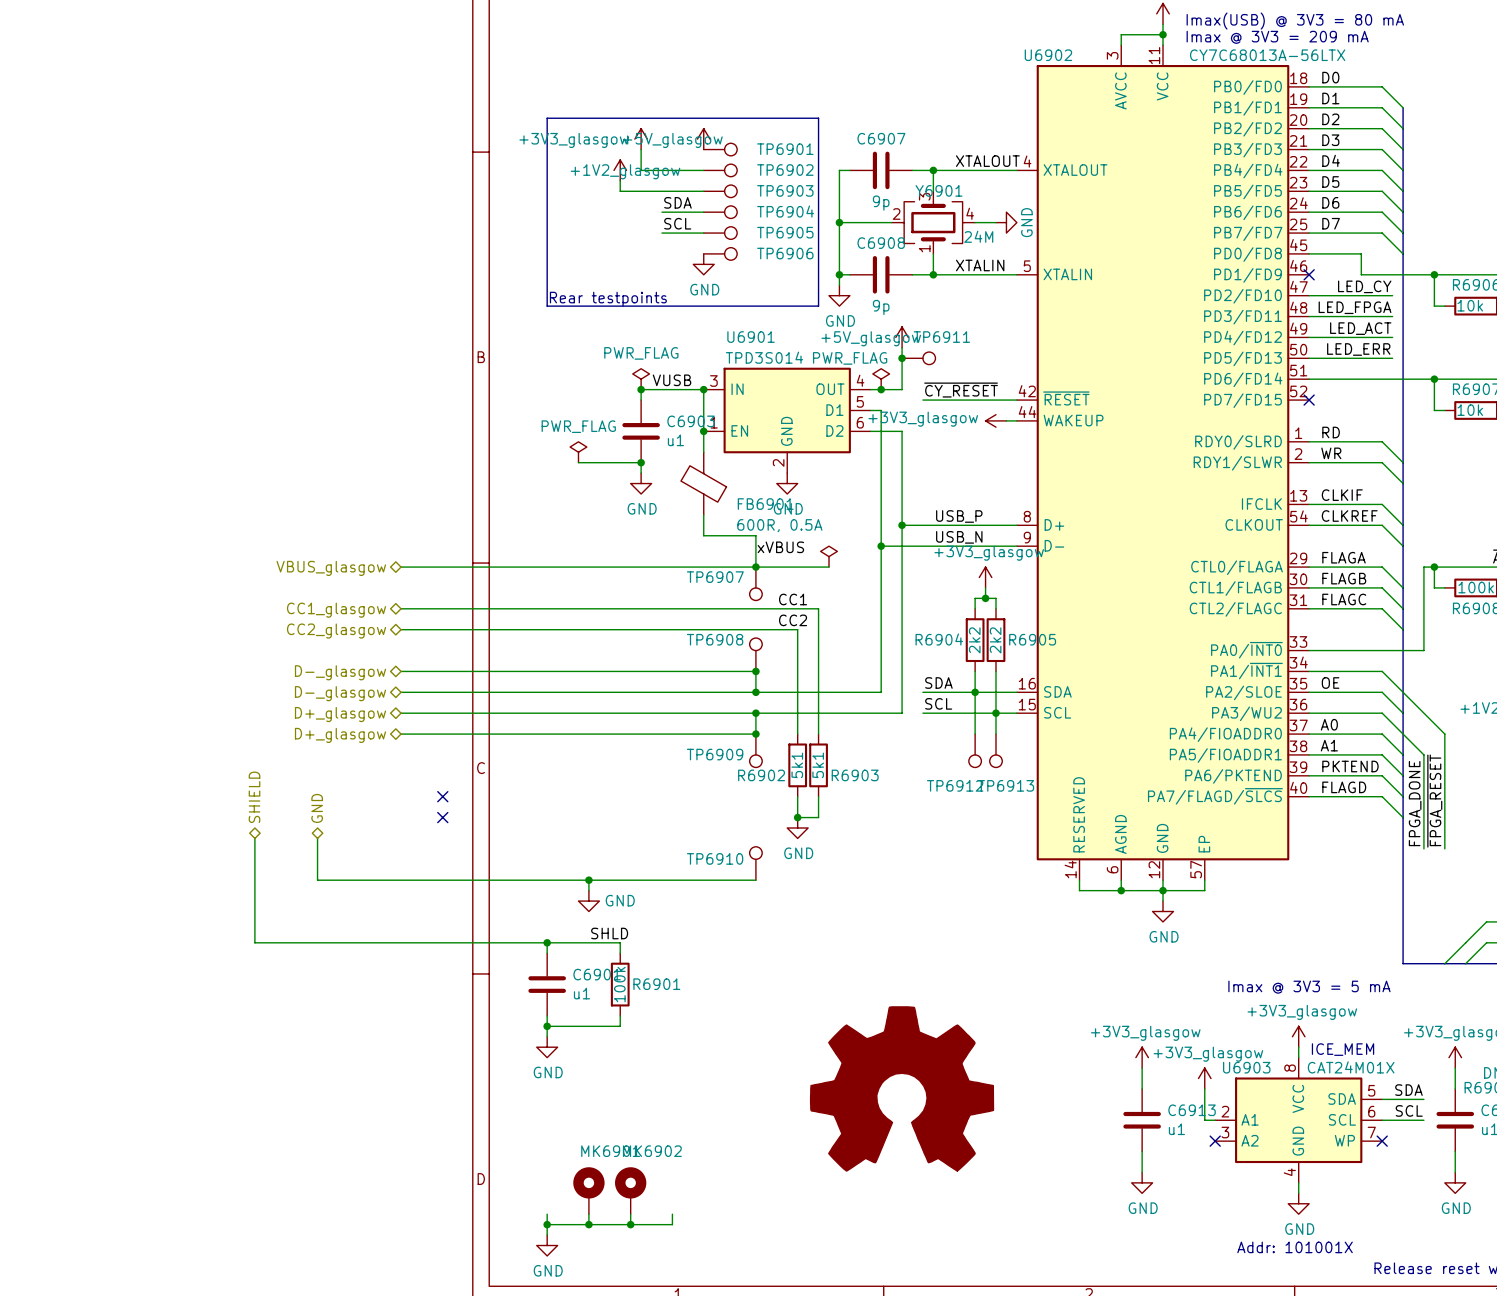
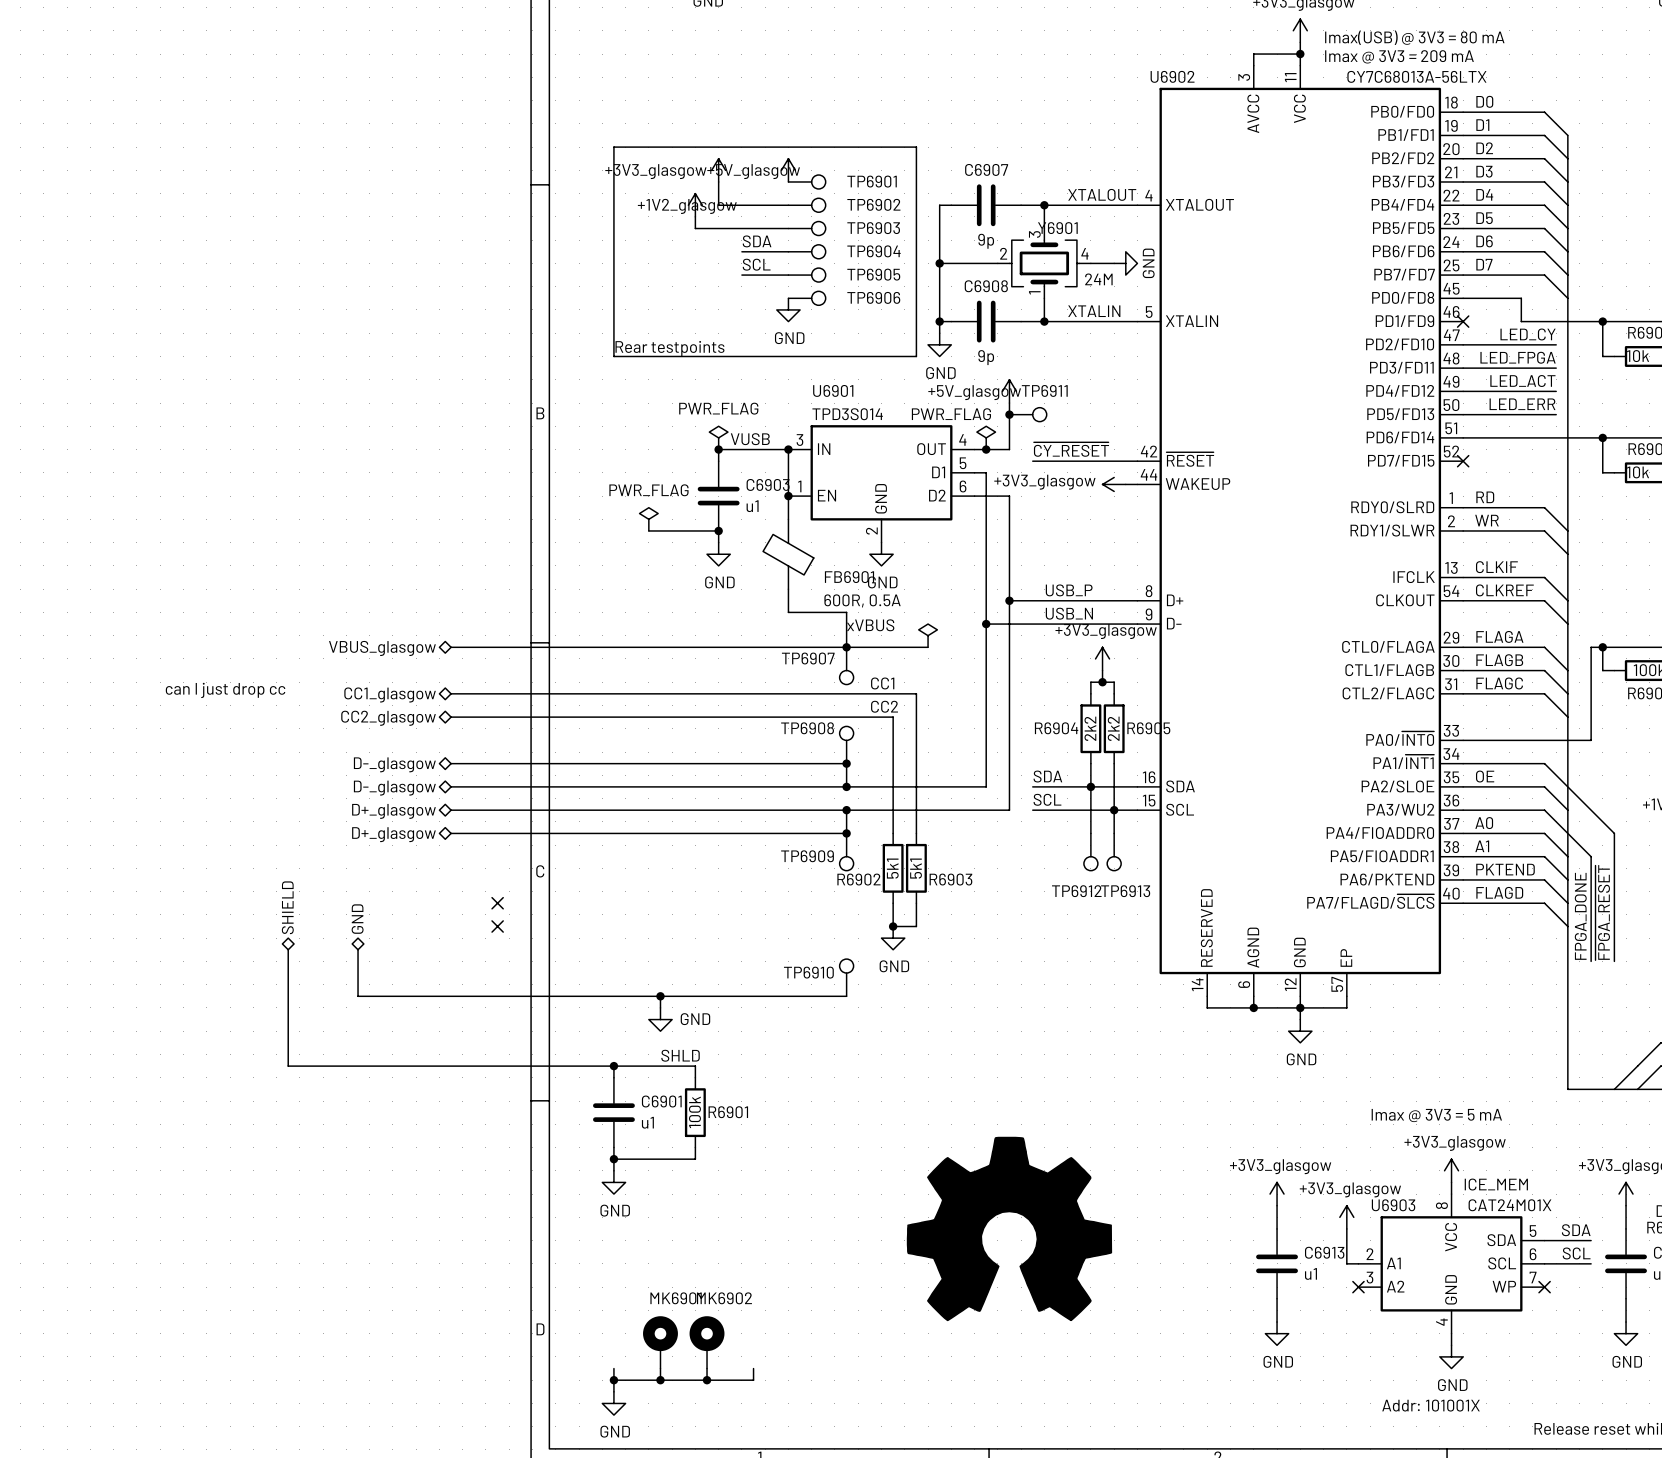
text: none -> can I just drop cc (225, 690)

